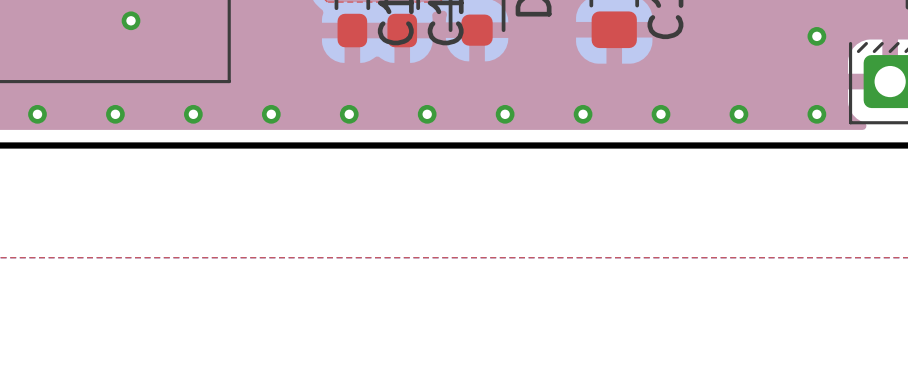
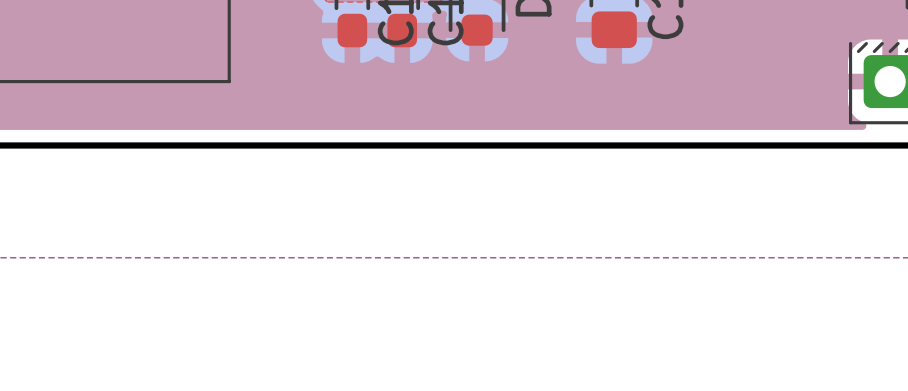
via: (131, 20) -> none
via: (816, 36) -> none
via: (37, 114) -> none
via: (115, 114) -> none
via: (193, 114) -> none
via: (271, 114) -> none
via: (349, 114) -> none
via: (427, 114) -> none
via: (505, 114) -> none
via: (583, 114) -> none
via: (661, 114) -> none
via: (738, 114) -> none
via: (816, 114) -> none

